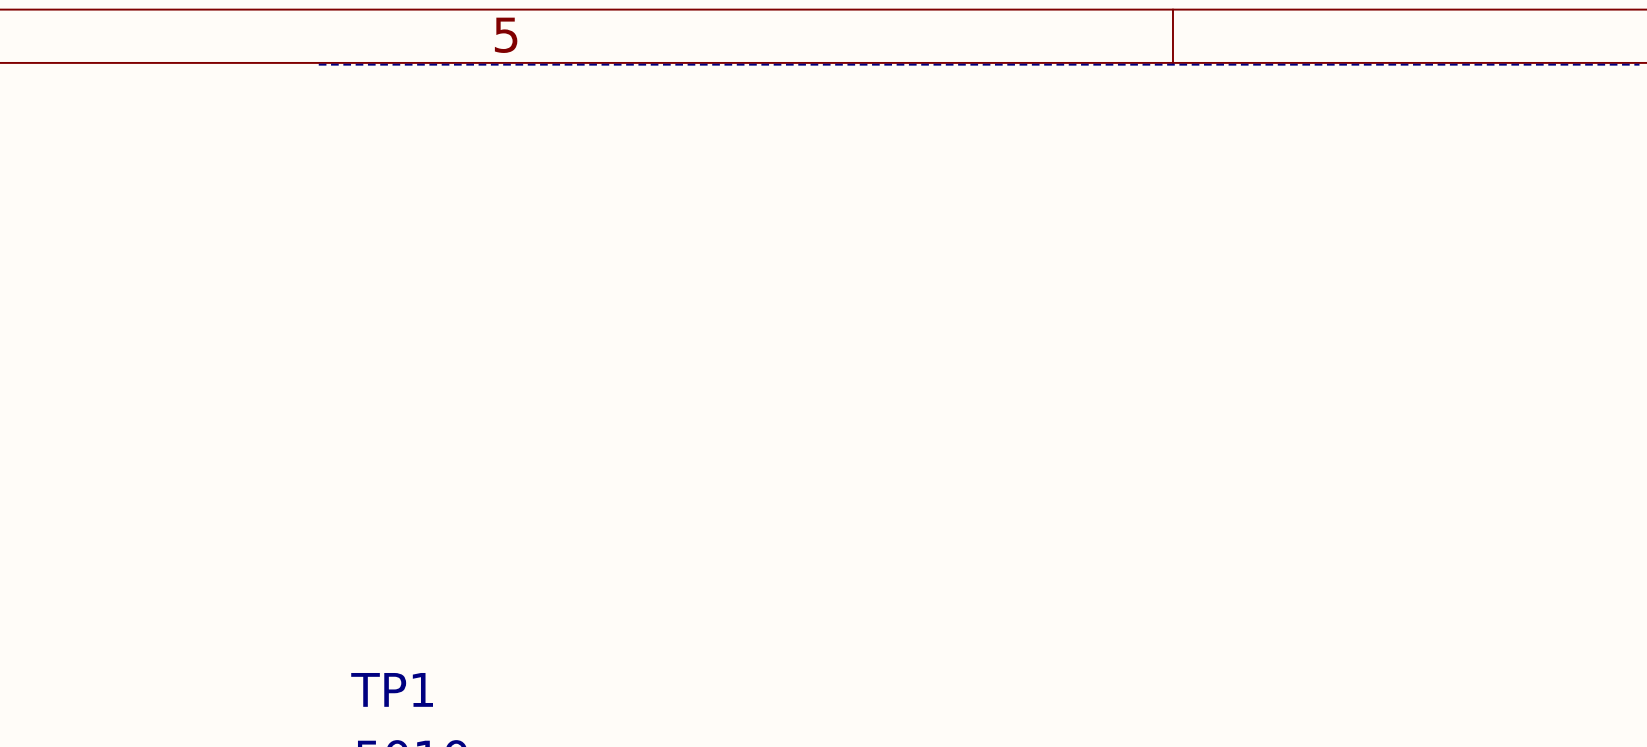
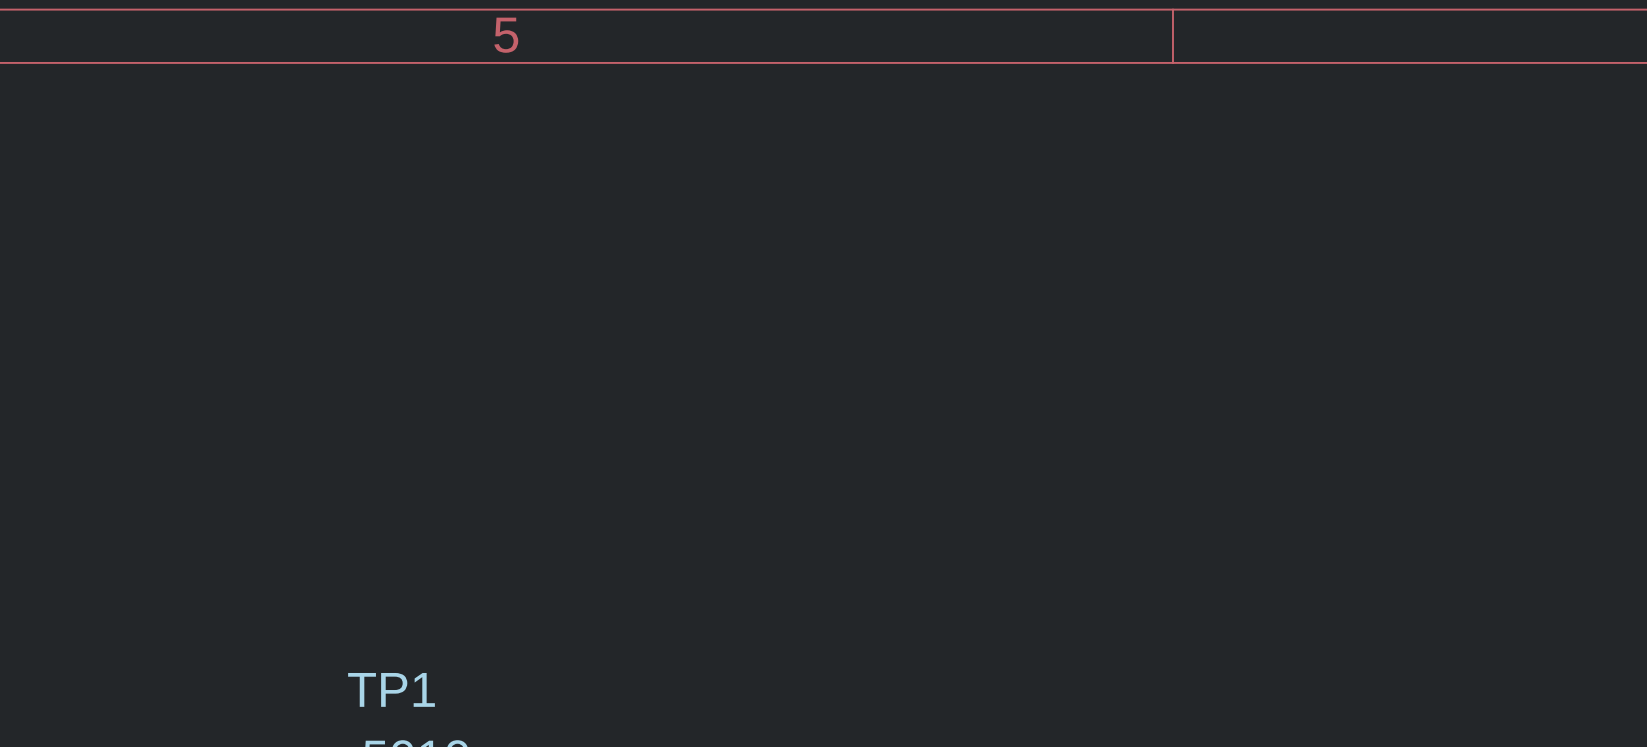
line: (318, 64) (1639, 64) -> none

